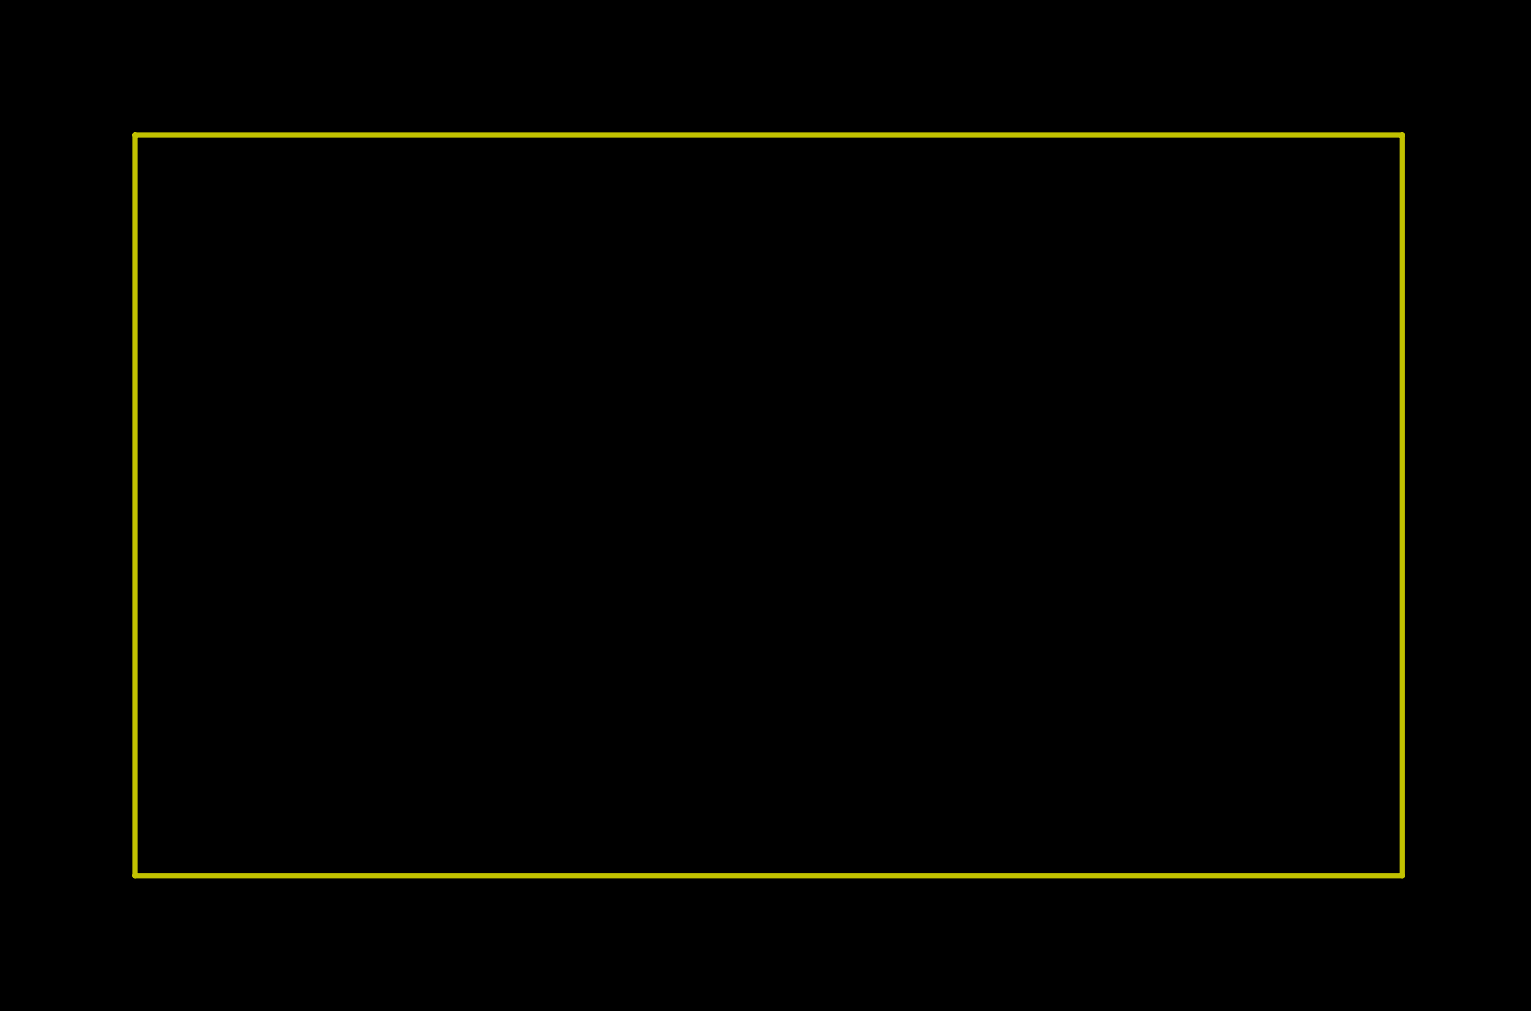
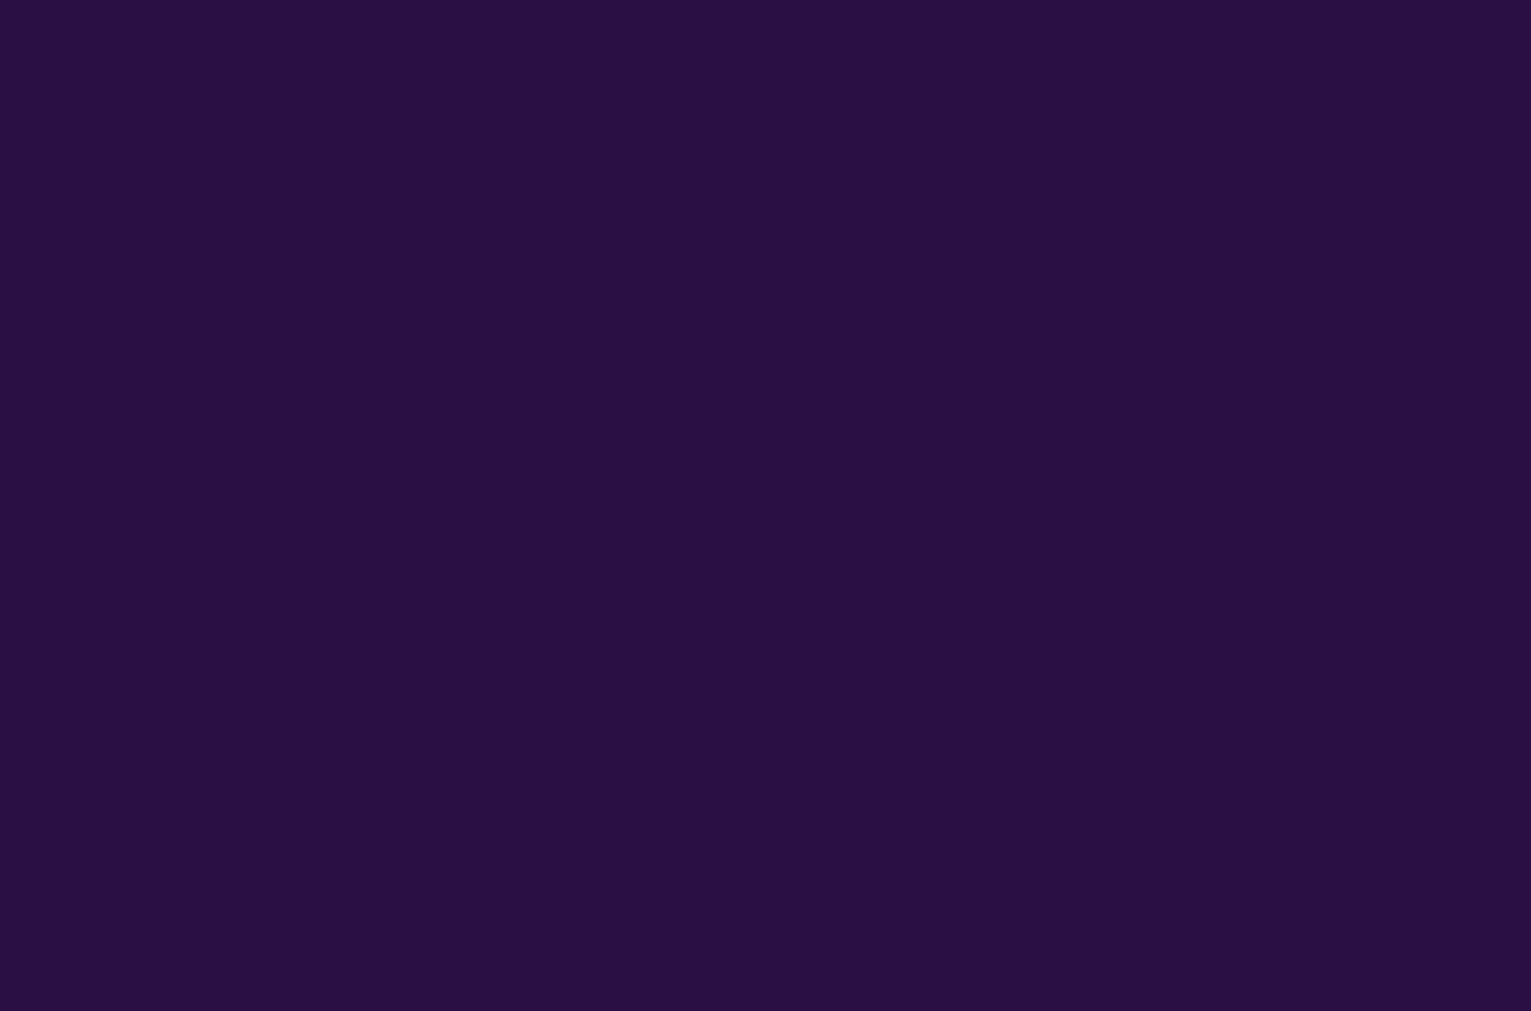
board edge: (1402, 135) (1402, 875) (135, 875) (135, 135) (1402, 135) -> none

